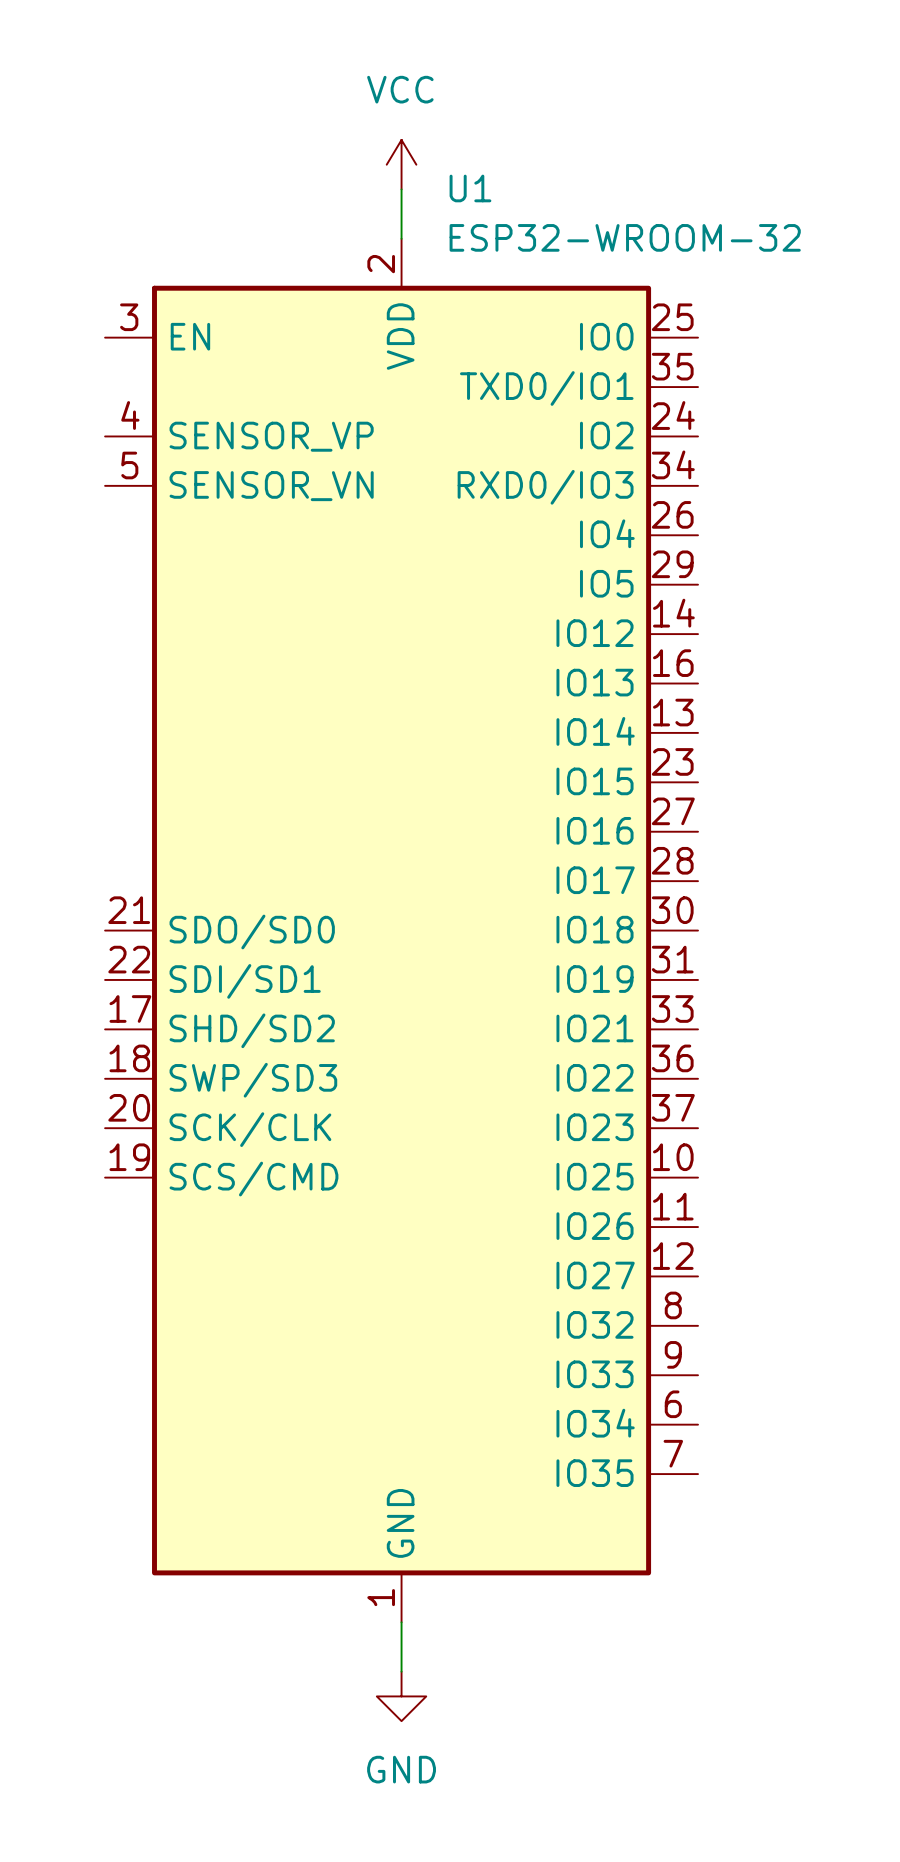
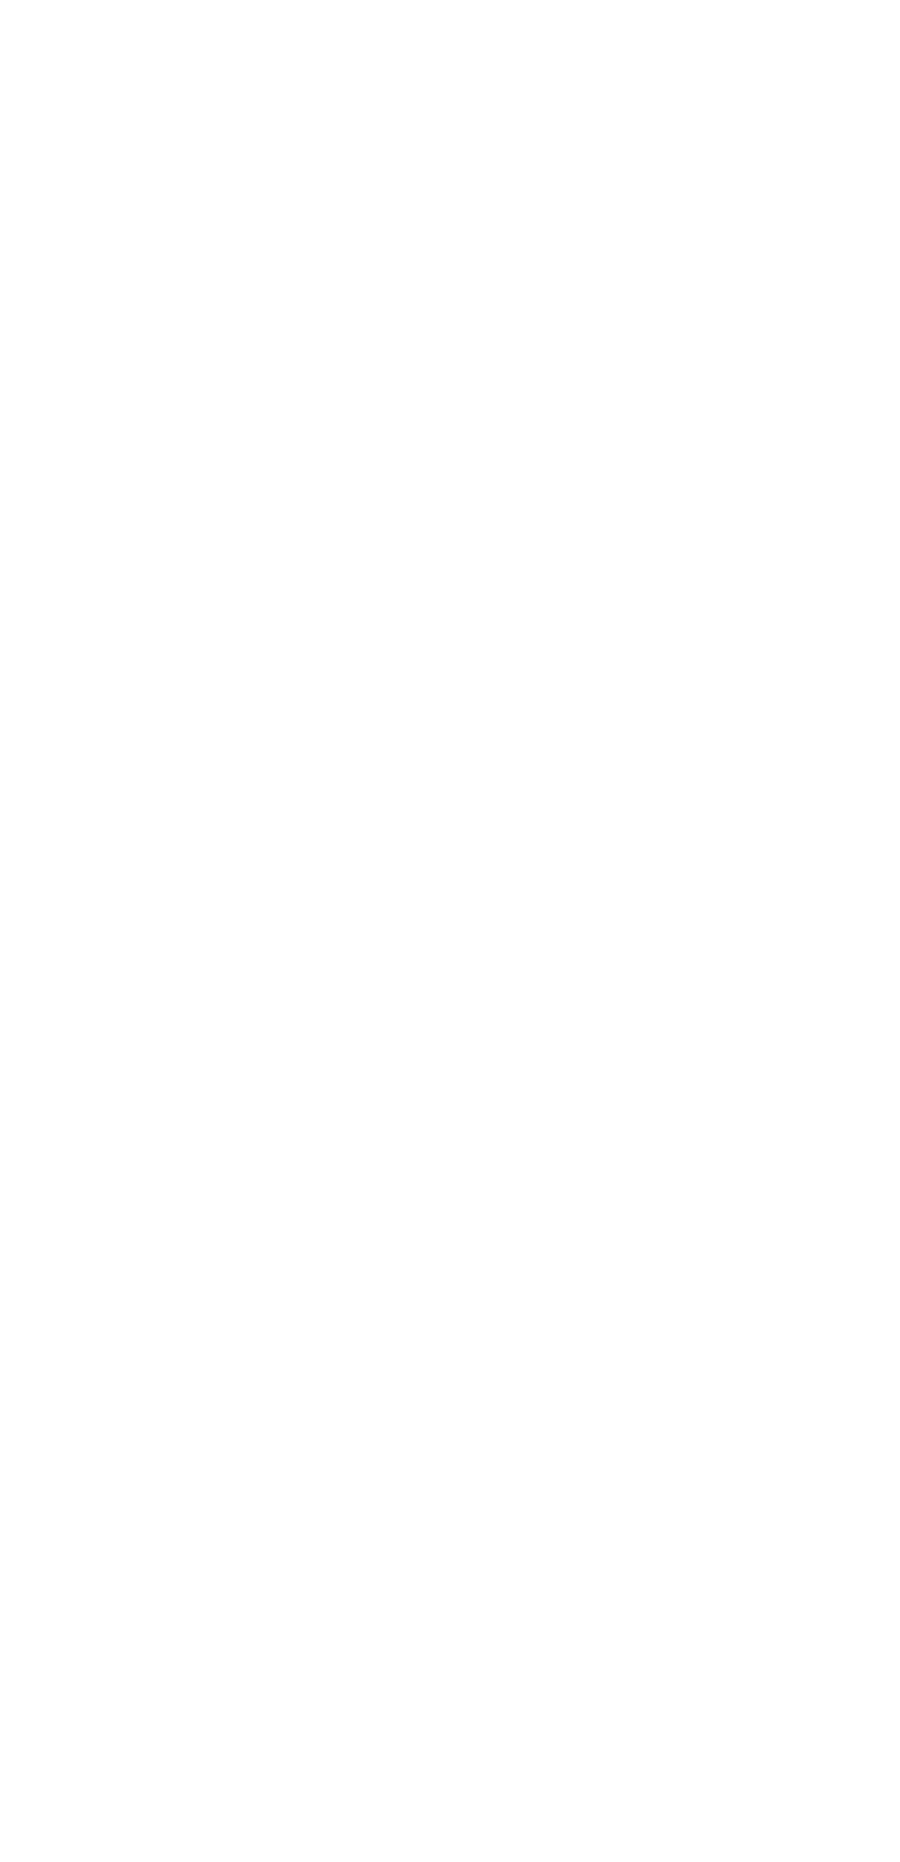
power symbol: VCC (401, 164) -> none
wire: (401, 189) (401, 238) -> none
U1: ESP32-WROOM-32 (401, 930) -> none
wire: (401, 1622) (401, 1671) -> none
power symbol: GND (401, 1696) -> none

